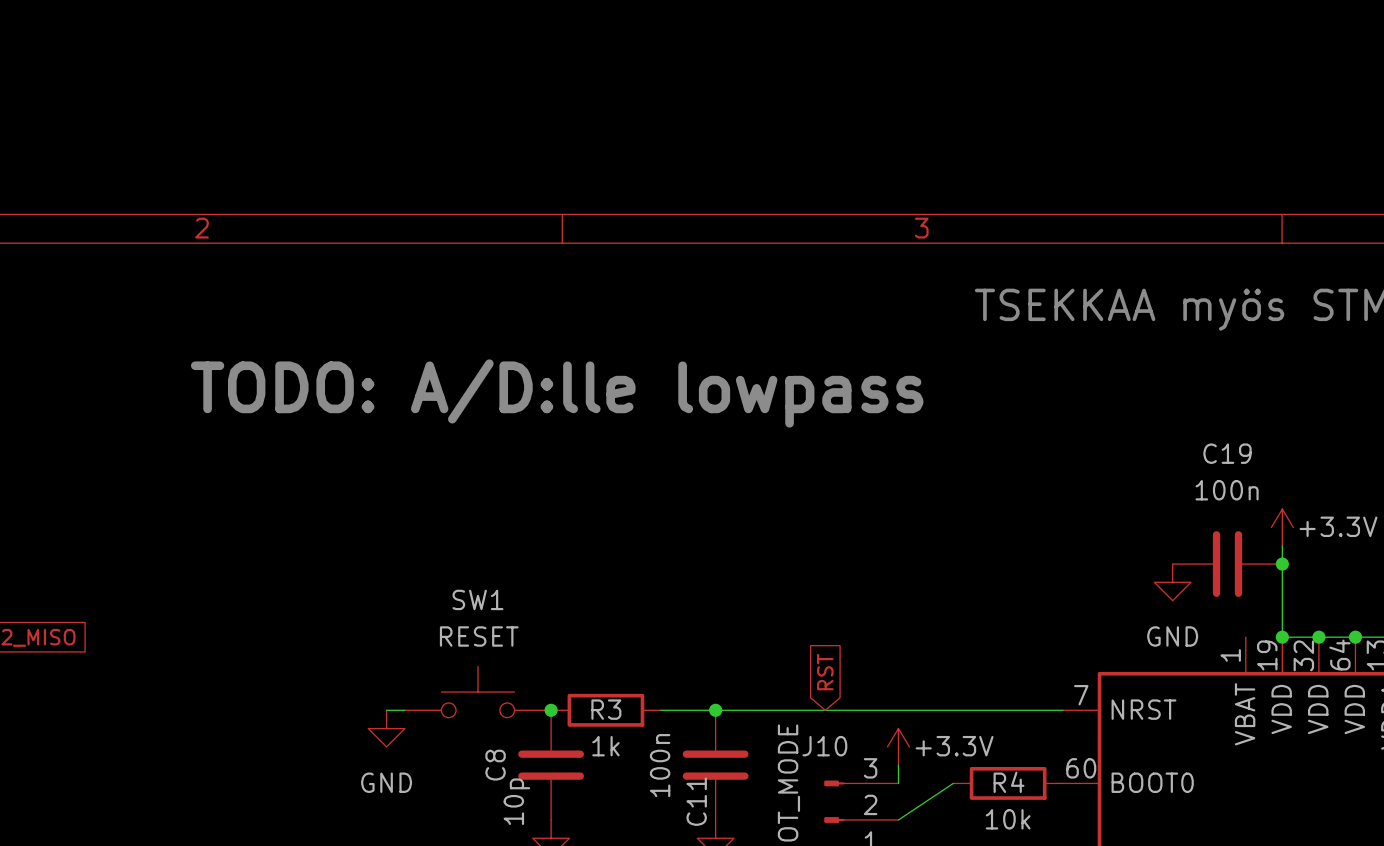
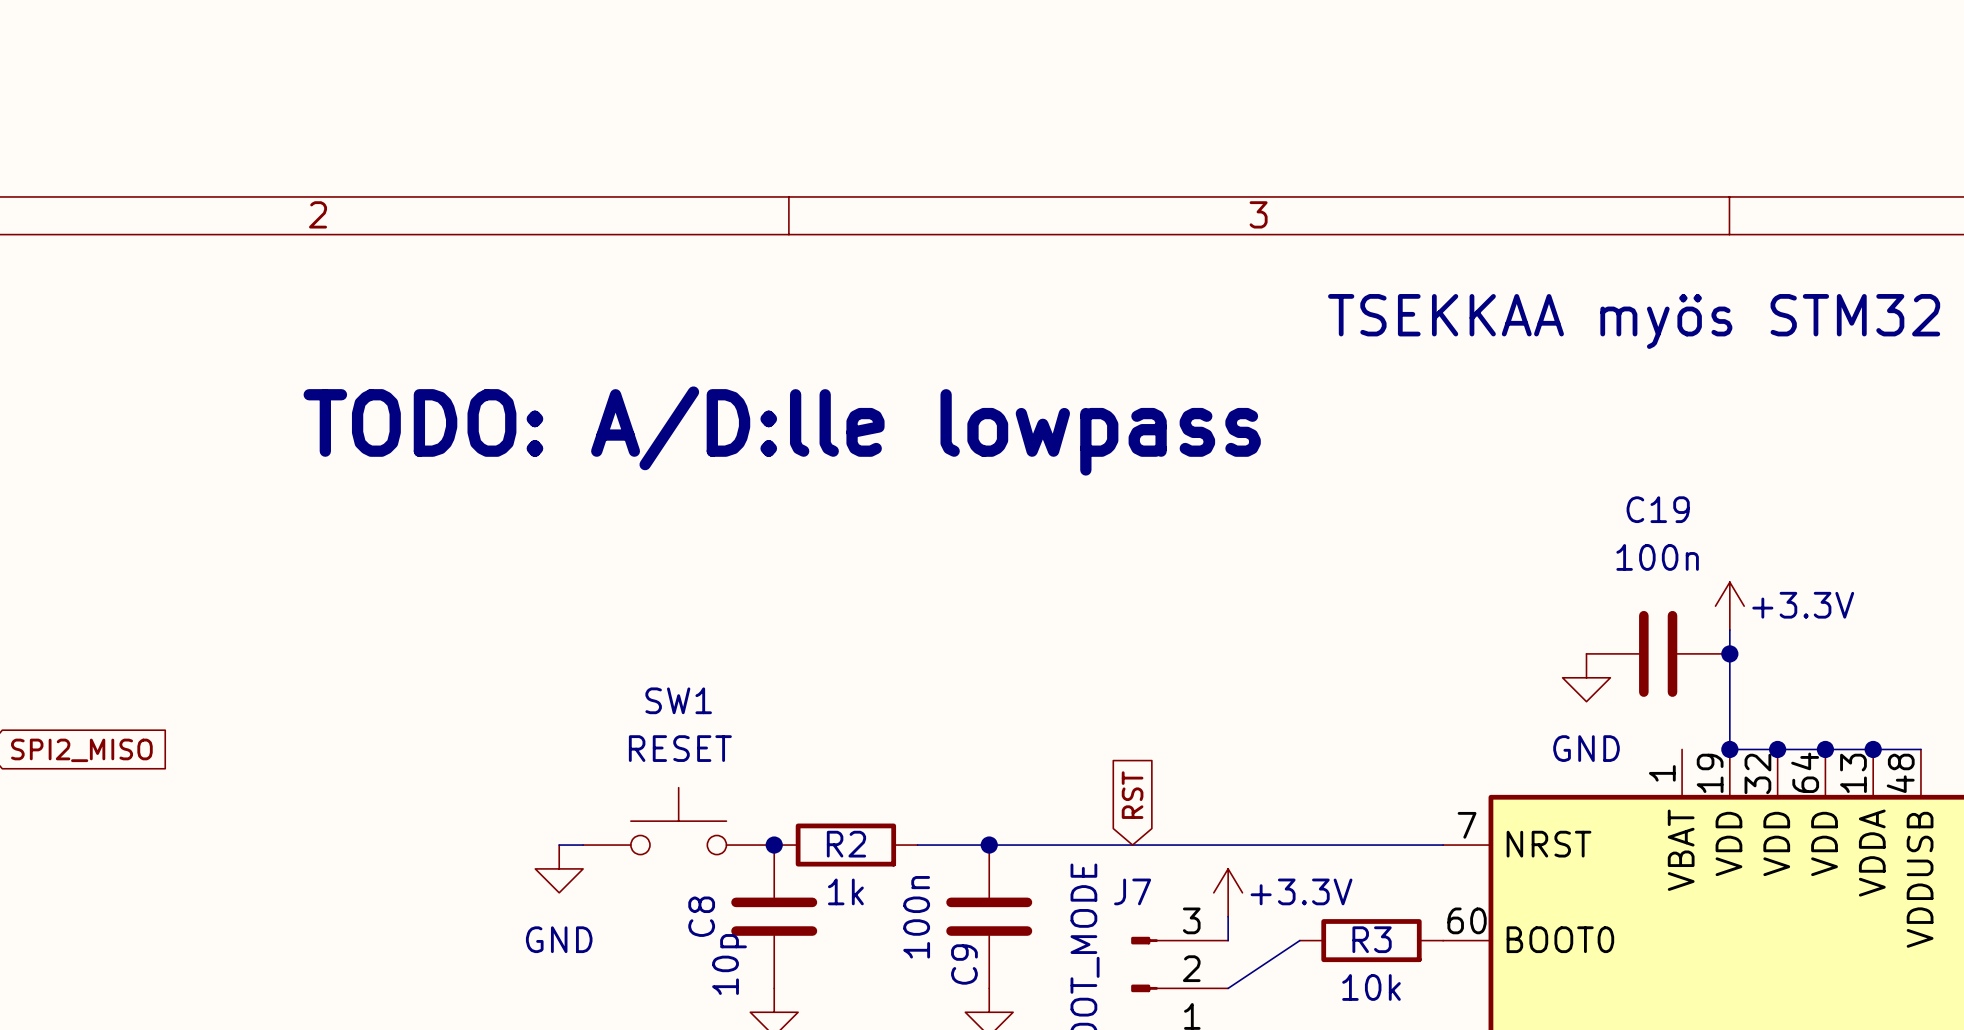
R3 name: R3 (606, 709) -> R2 (846, 844)
J10 name: J10 (824, 746) -> J7 (1132, 891)
R4 name: R4 (1009, 782) -> R3 (1372, 939)
C11 name: C11 (696, 801) -> C9 (964, 964)

